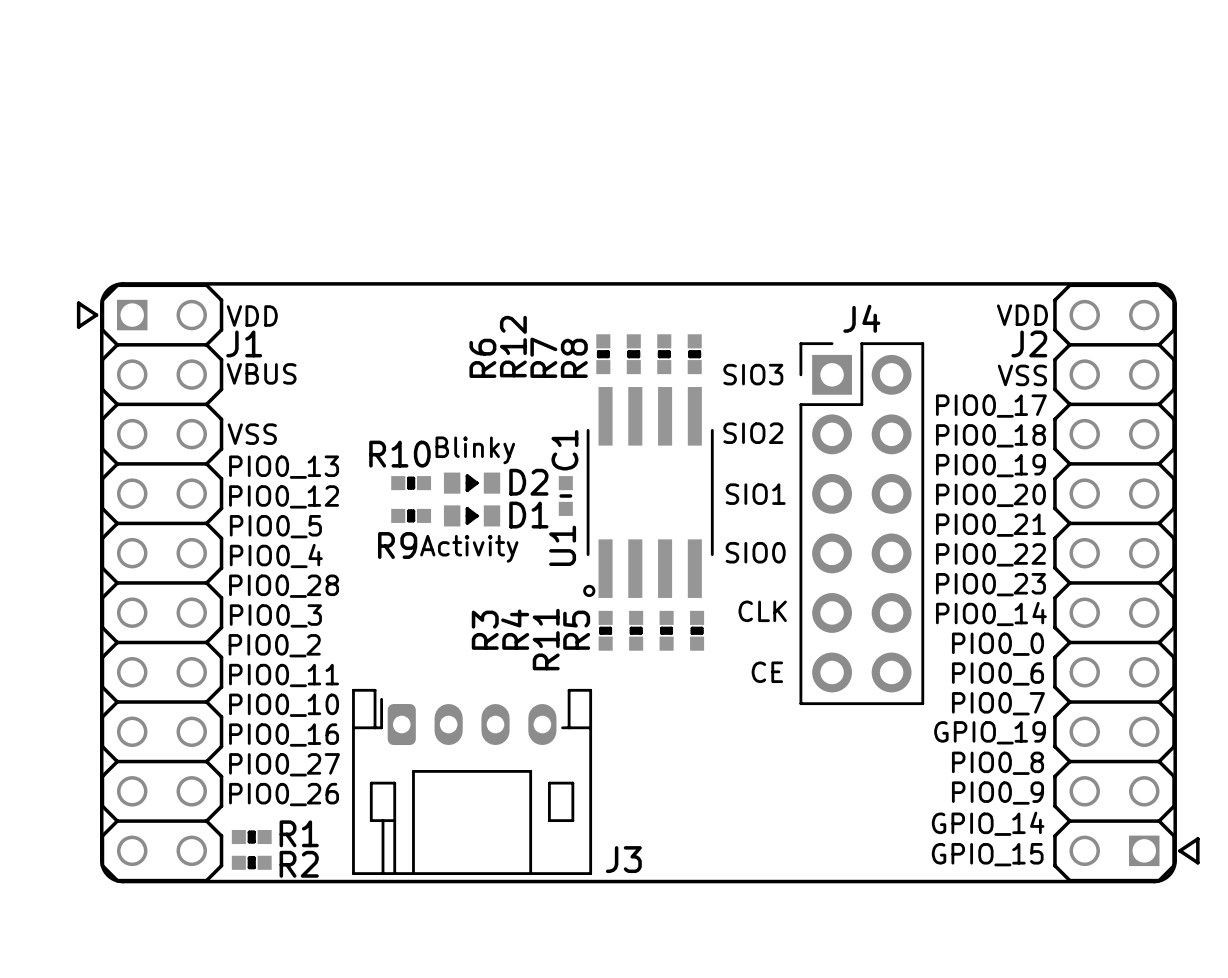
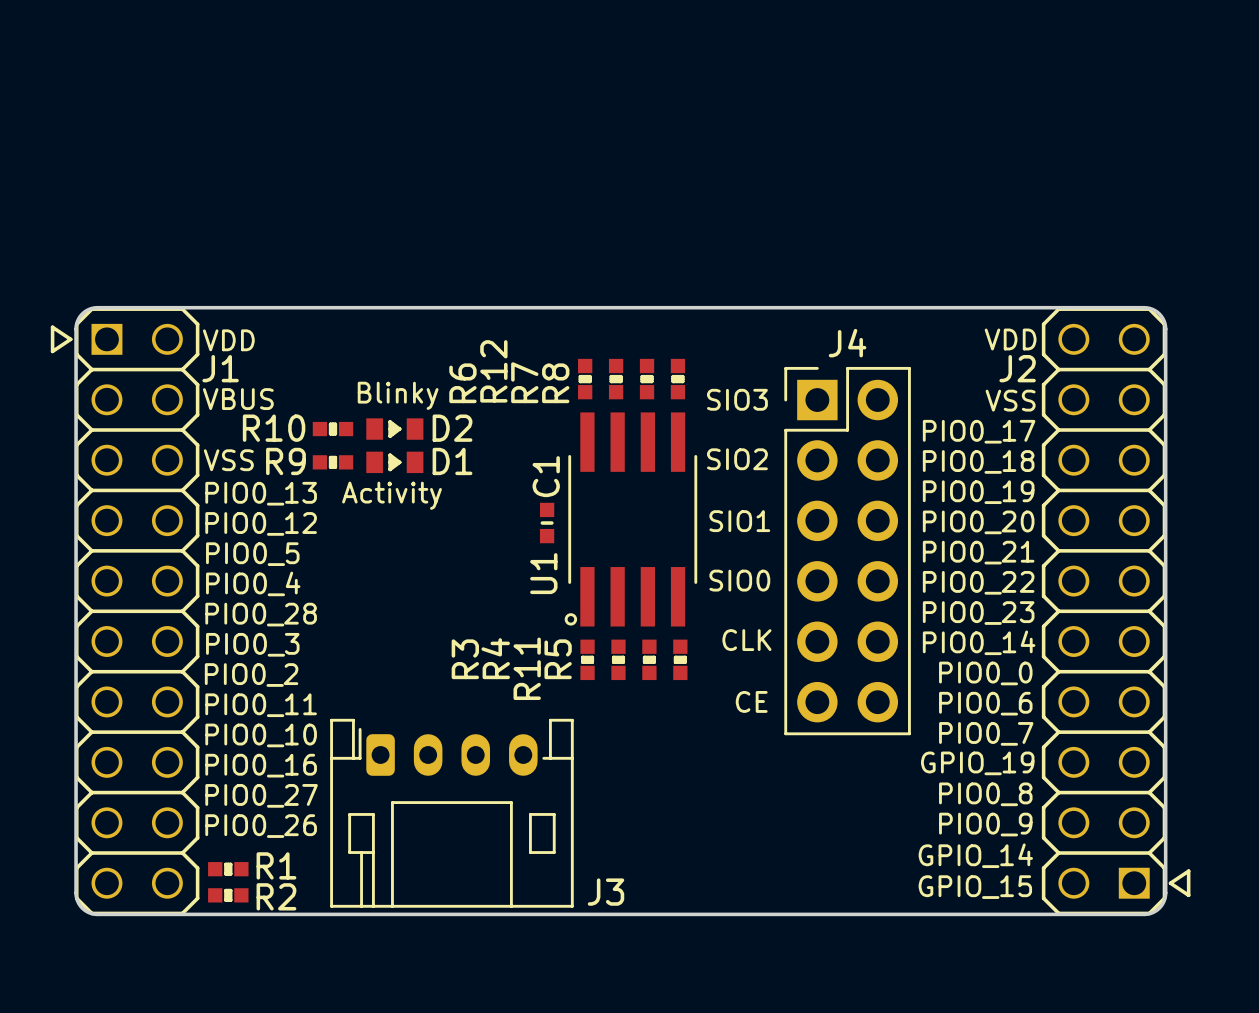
text position: Blinky (475, 450) -> Blinky (398, 395)
R10 name position: R10 (399, 454) -> R10 (274, 428)
R10 position: (411, 483) -> (332, 429)
D2 position: (472, 483) -> (394, 429)
R9 position: (411, 515) -> (332, 462)
D1 position: (472, 515) -> (394, 462)
R9 name position: R9 (397, 545) -> R9 (285, 461)
text position: Activity (469, 548) -> Activity (392, 495)

